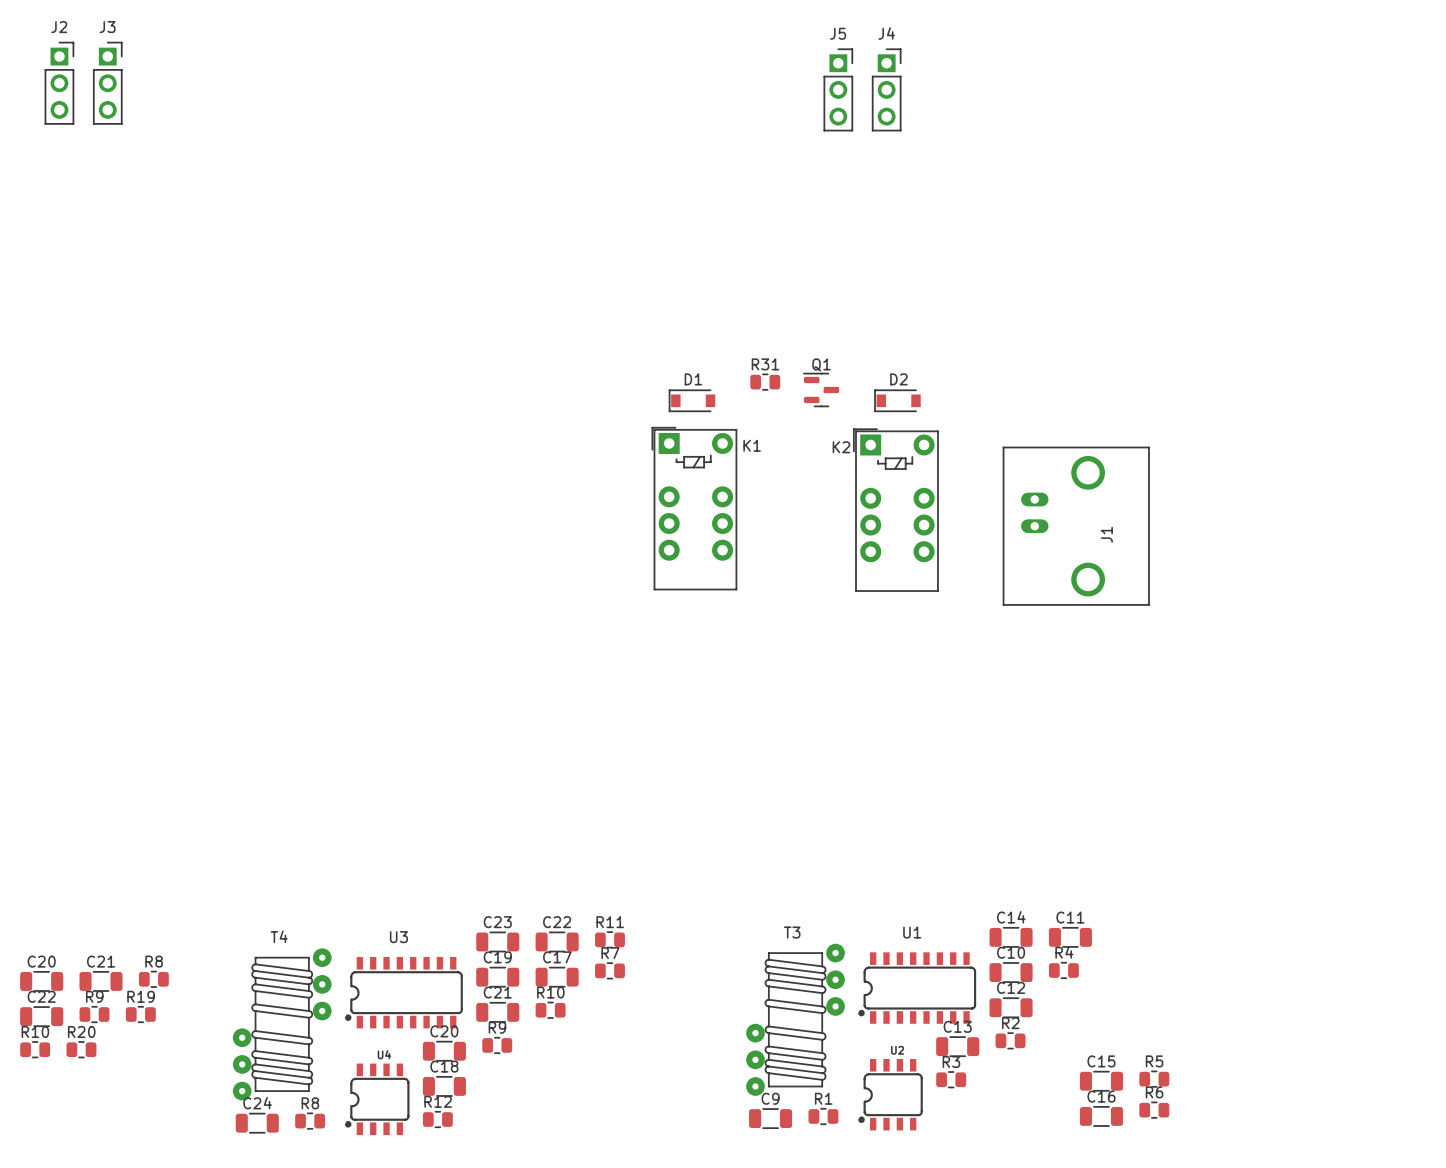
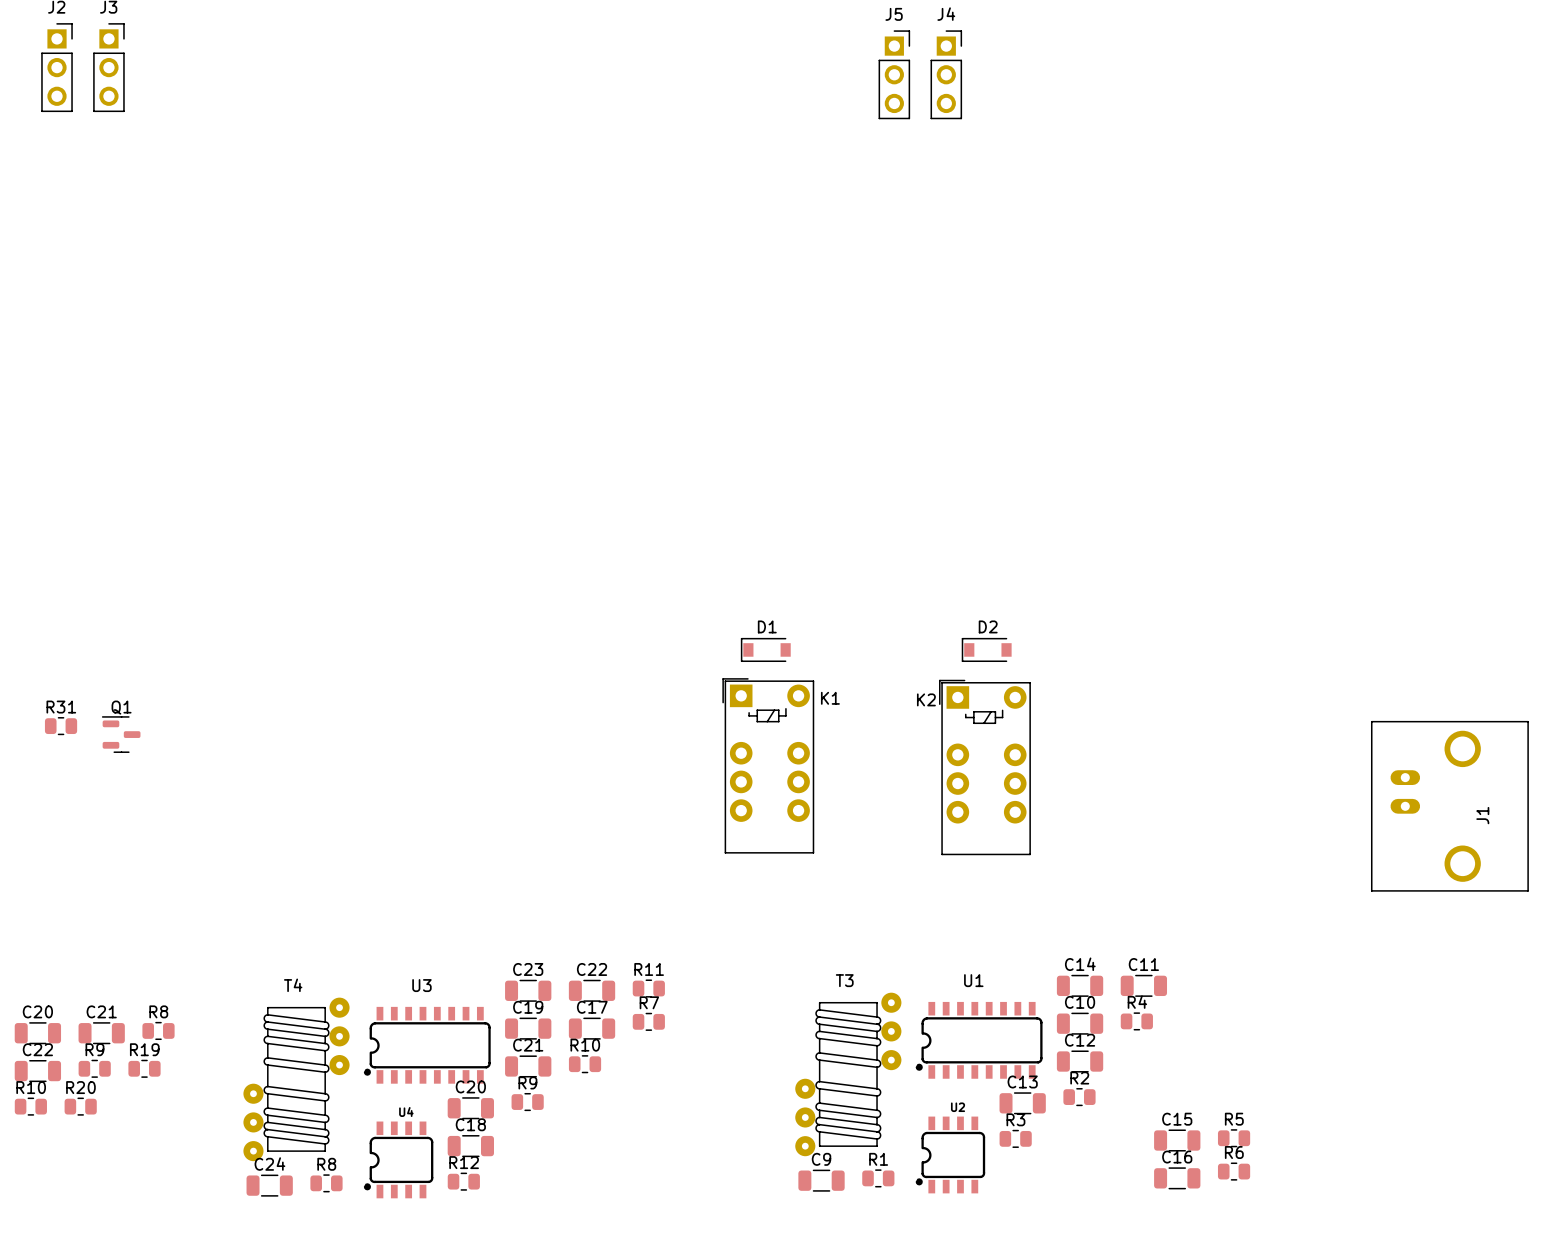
R31 position: (765, 382) -> (61, 726)
Q1 position: (821, 389) -> (121, 734)
D1 position: (692, 400) -> (765, 649)
D2 position: (897, 400) -> (986, 649)
K1 position: (694, 508) -> (768, 765)
K2 position: (895, 510) -> (984, 767)
J1 position: (1076, 526) -> (1449, 806)

